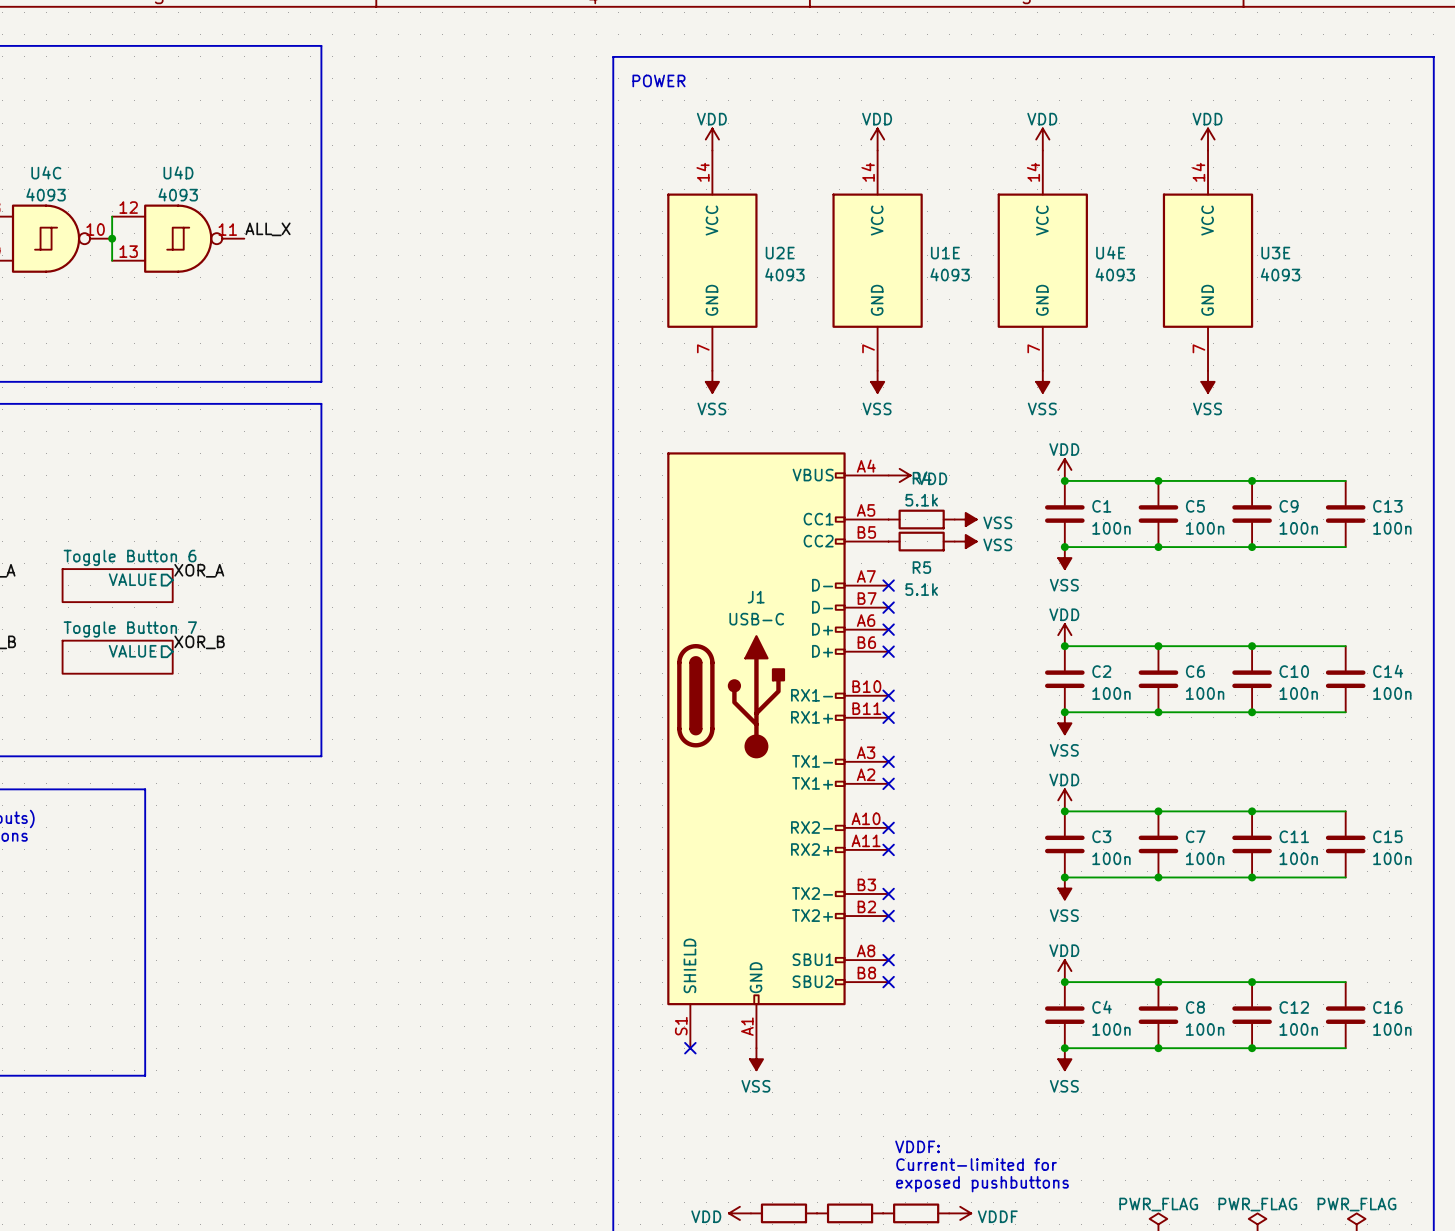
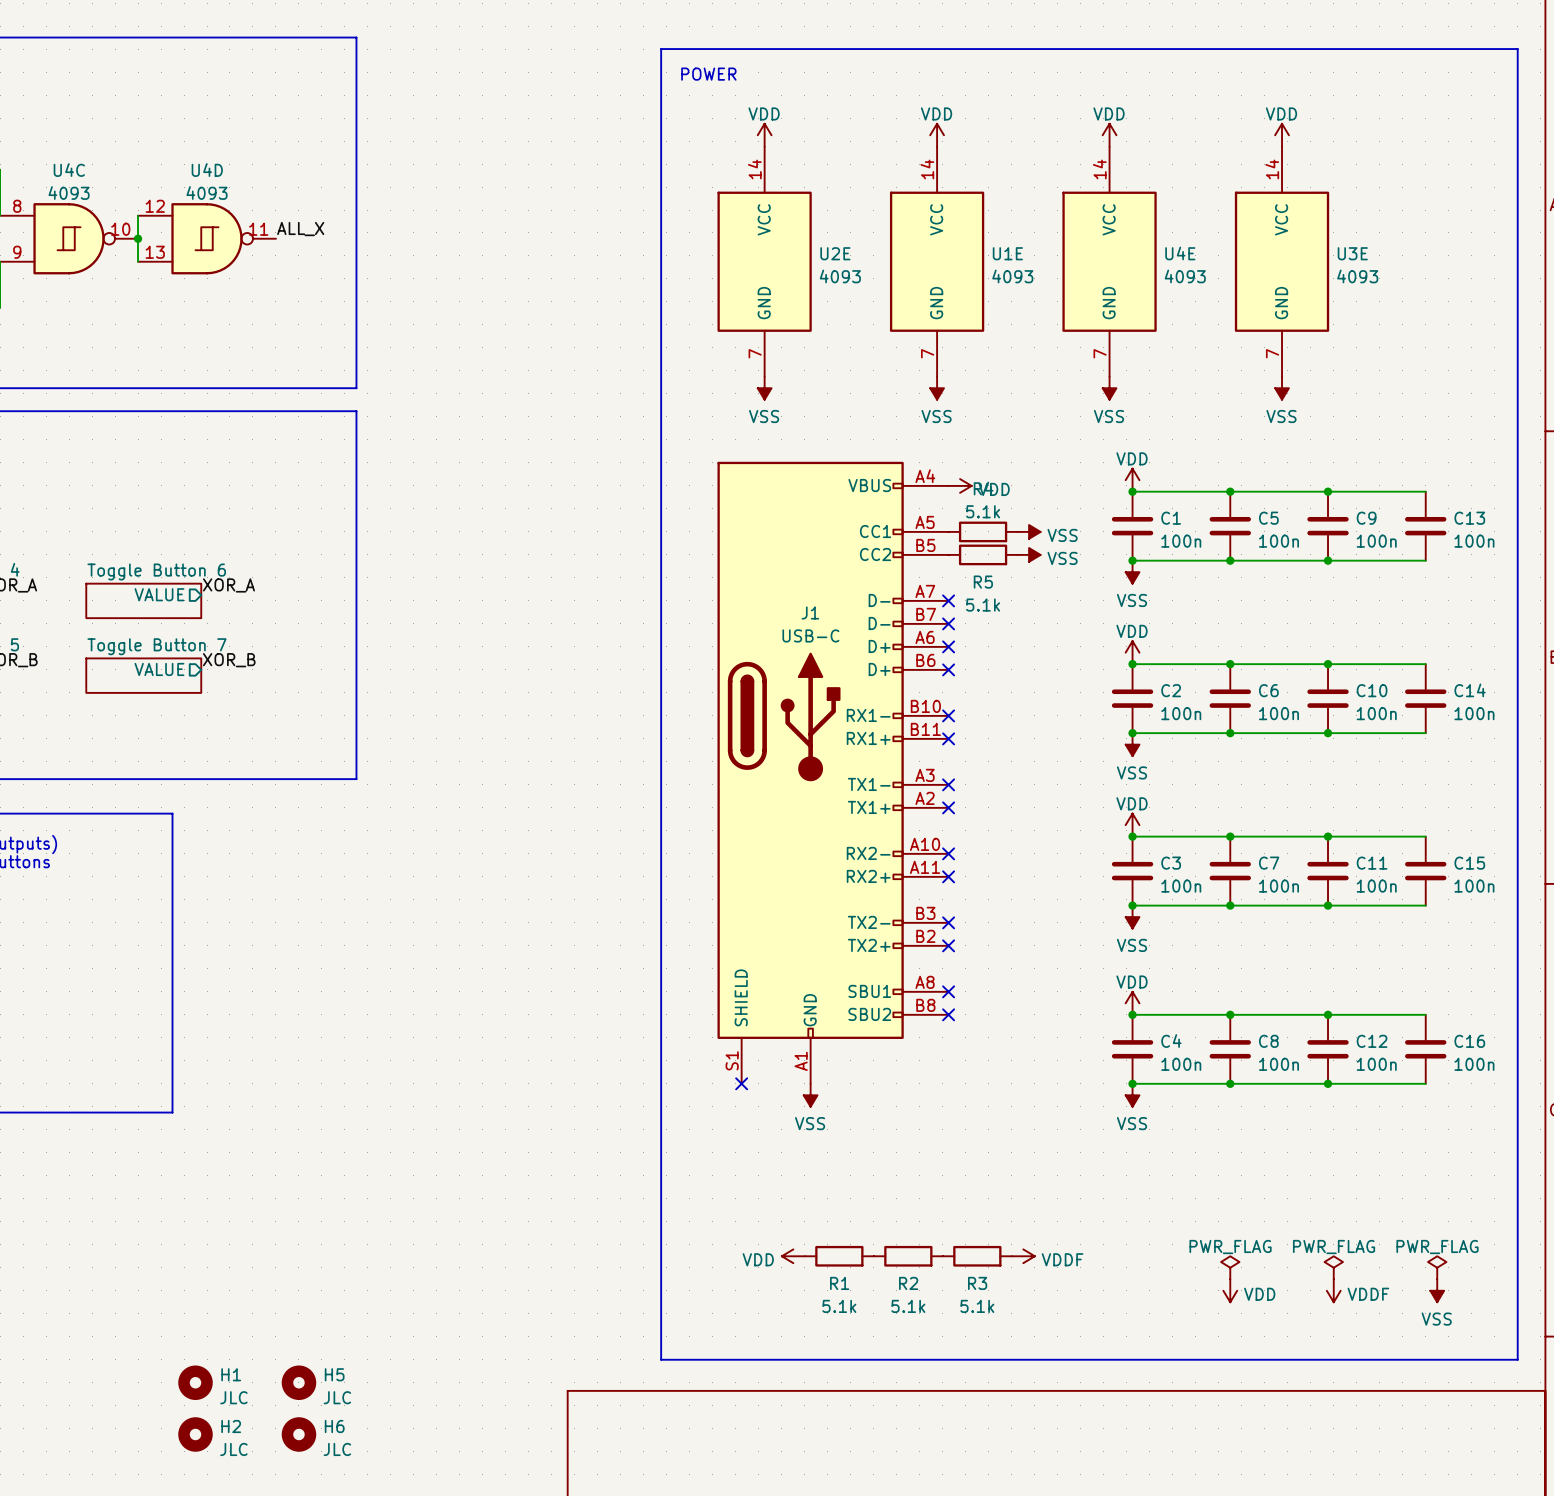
text: VDDF: (917, 1146) -> none
text: Current-limited for (976, 1164) -> none
text: exposed pushbuttons (982, 1184) -> none

